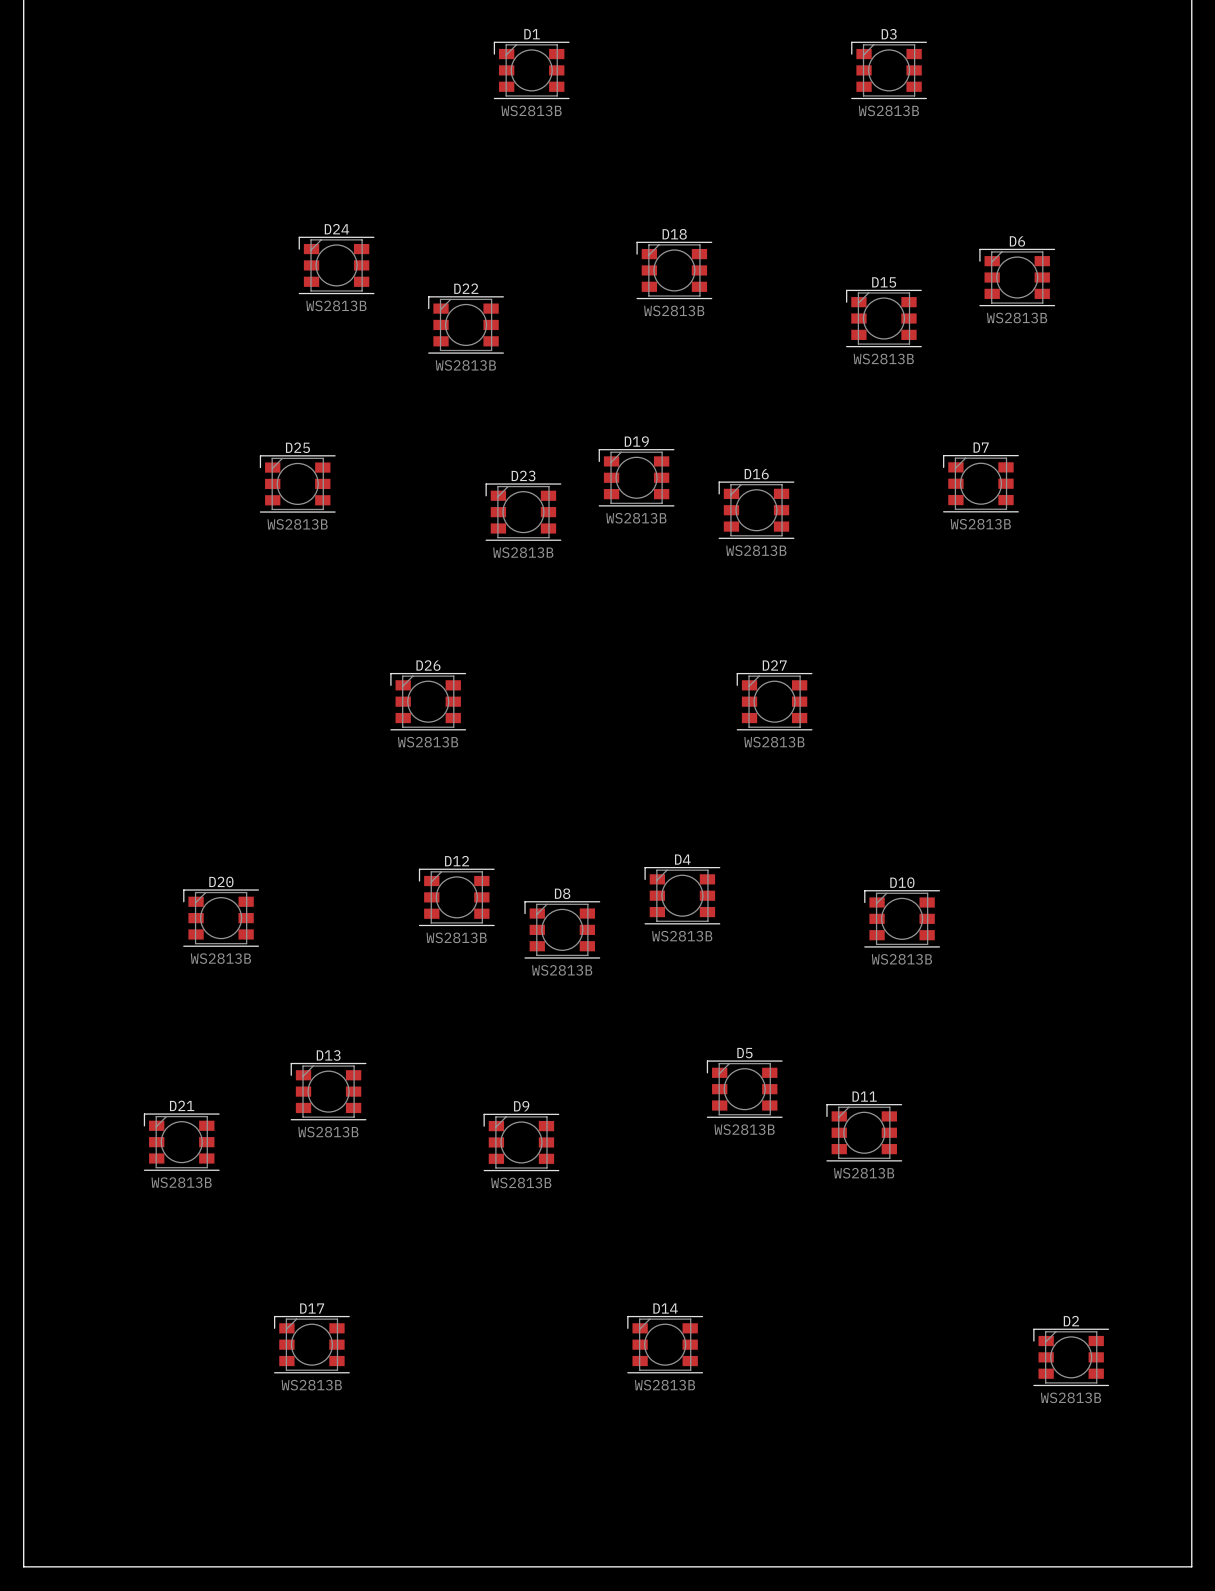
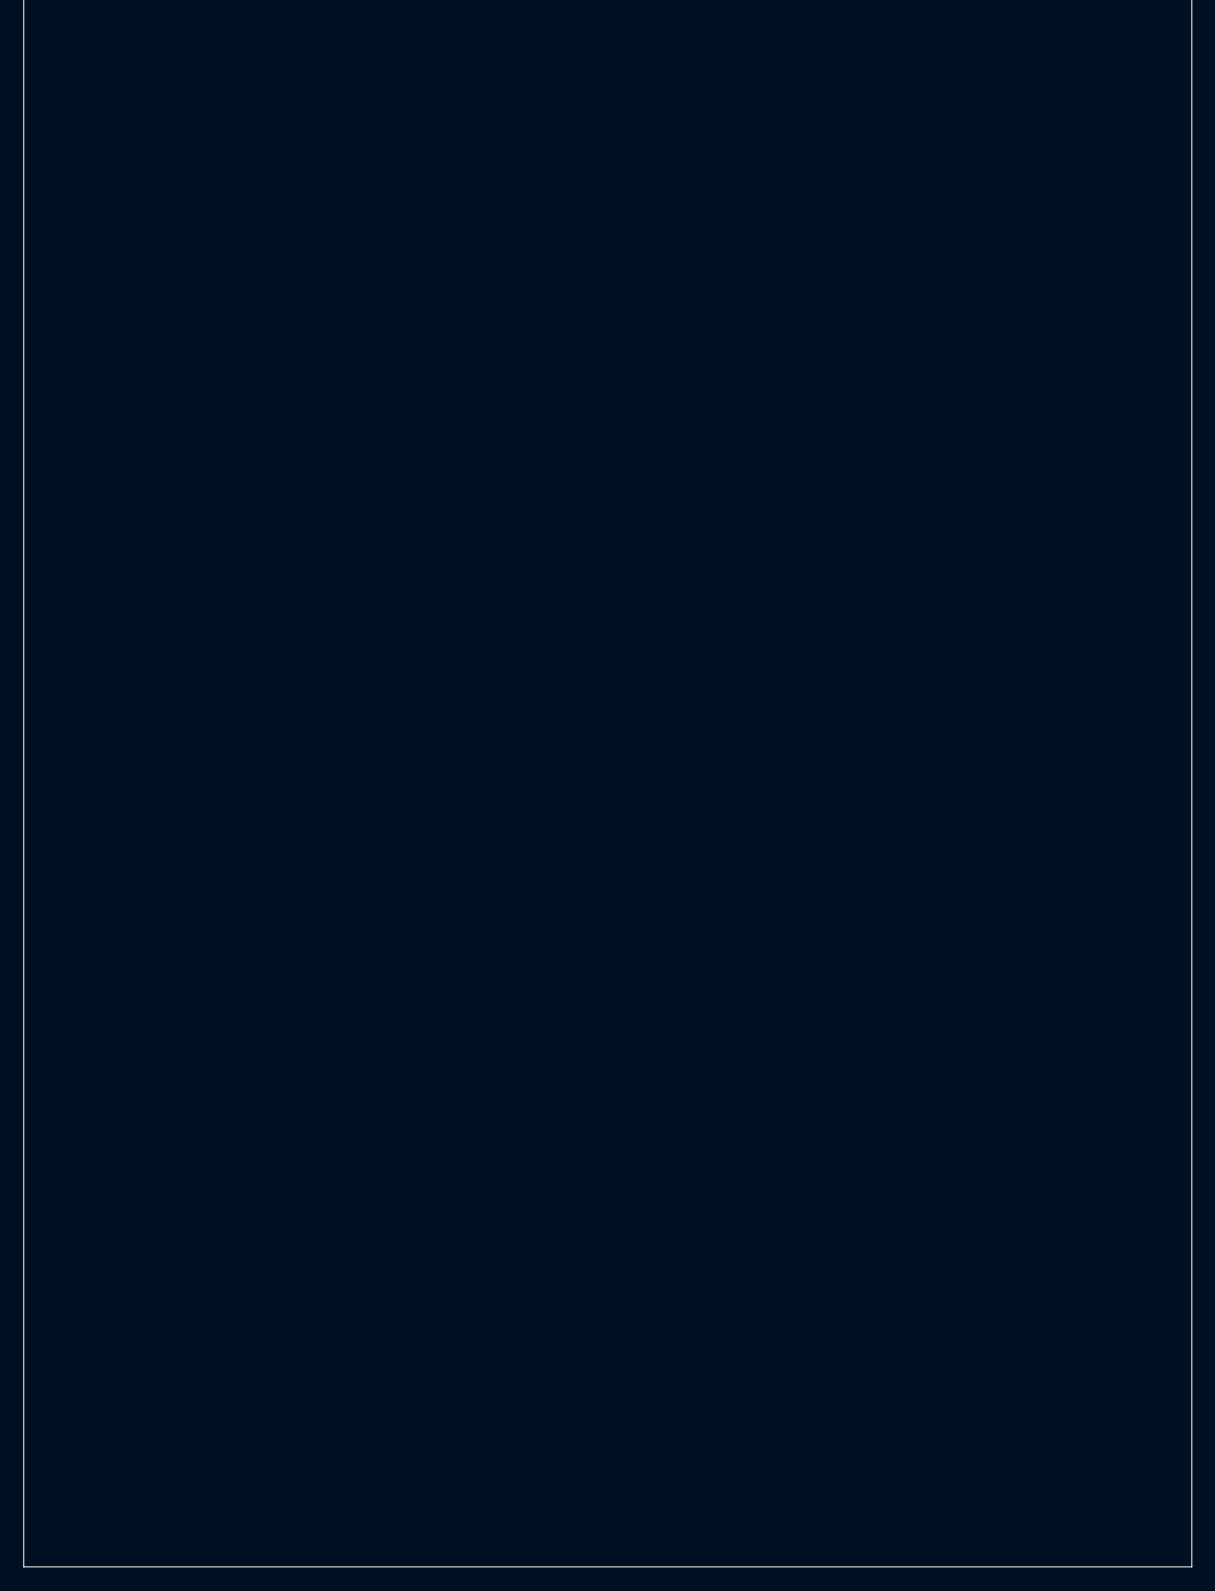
D1: WS2813B (531, 70) -> none
D3: WS2813B (889, 70) -> none
D24: WS2813B (336, 265) -> none
D18: WS2813B (674, 270) -> none
D6: WS2813B (1017, 277) -> none
D15: WS2813B (883, 318) -> none
D22: WS2813B (466, 324) -> none
D19: WS2813B (636, 477) -> none
D25: WS2813B (297, 483) -> none
D7: WS2813B (980, 483) -> none
D16: WS2813B (756, 510) -> none
D23: WS2813B (523, 512) -> none
D26: WS2813B (428, 701) -> none
D27: WS2813B (774, 701) -> none
D4: WS2813B (682, 895) -> none
D12: WS2813B (456, 897) -> none
D20: WS2813B (221, 918) -> none
D10: WS2813B (902, 918) -> none
D8: WS2813B (562, 929) -> none
D5: WS2813B (744, 1089) -> none
D13: WS2813B (328, 1091) -> none
D11: WS2813B (864, 1132) -> none
D21: WS2813B (181, 1142) -> none
D9: WS2813B (521, 1142) -> none
D17: WS2813B (311, 1344) -> none
D14: WS2813B (665, 1344) -> none
D2: WS2813B (1071, 1357) -> none

